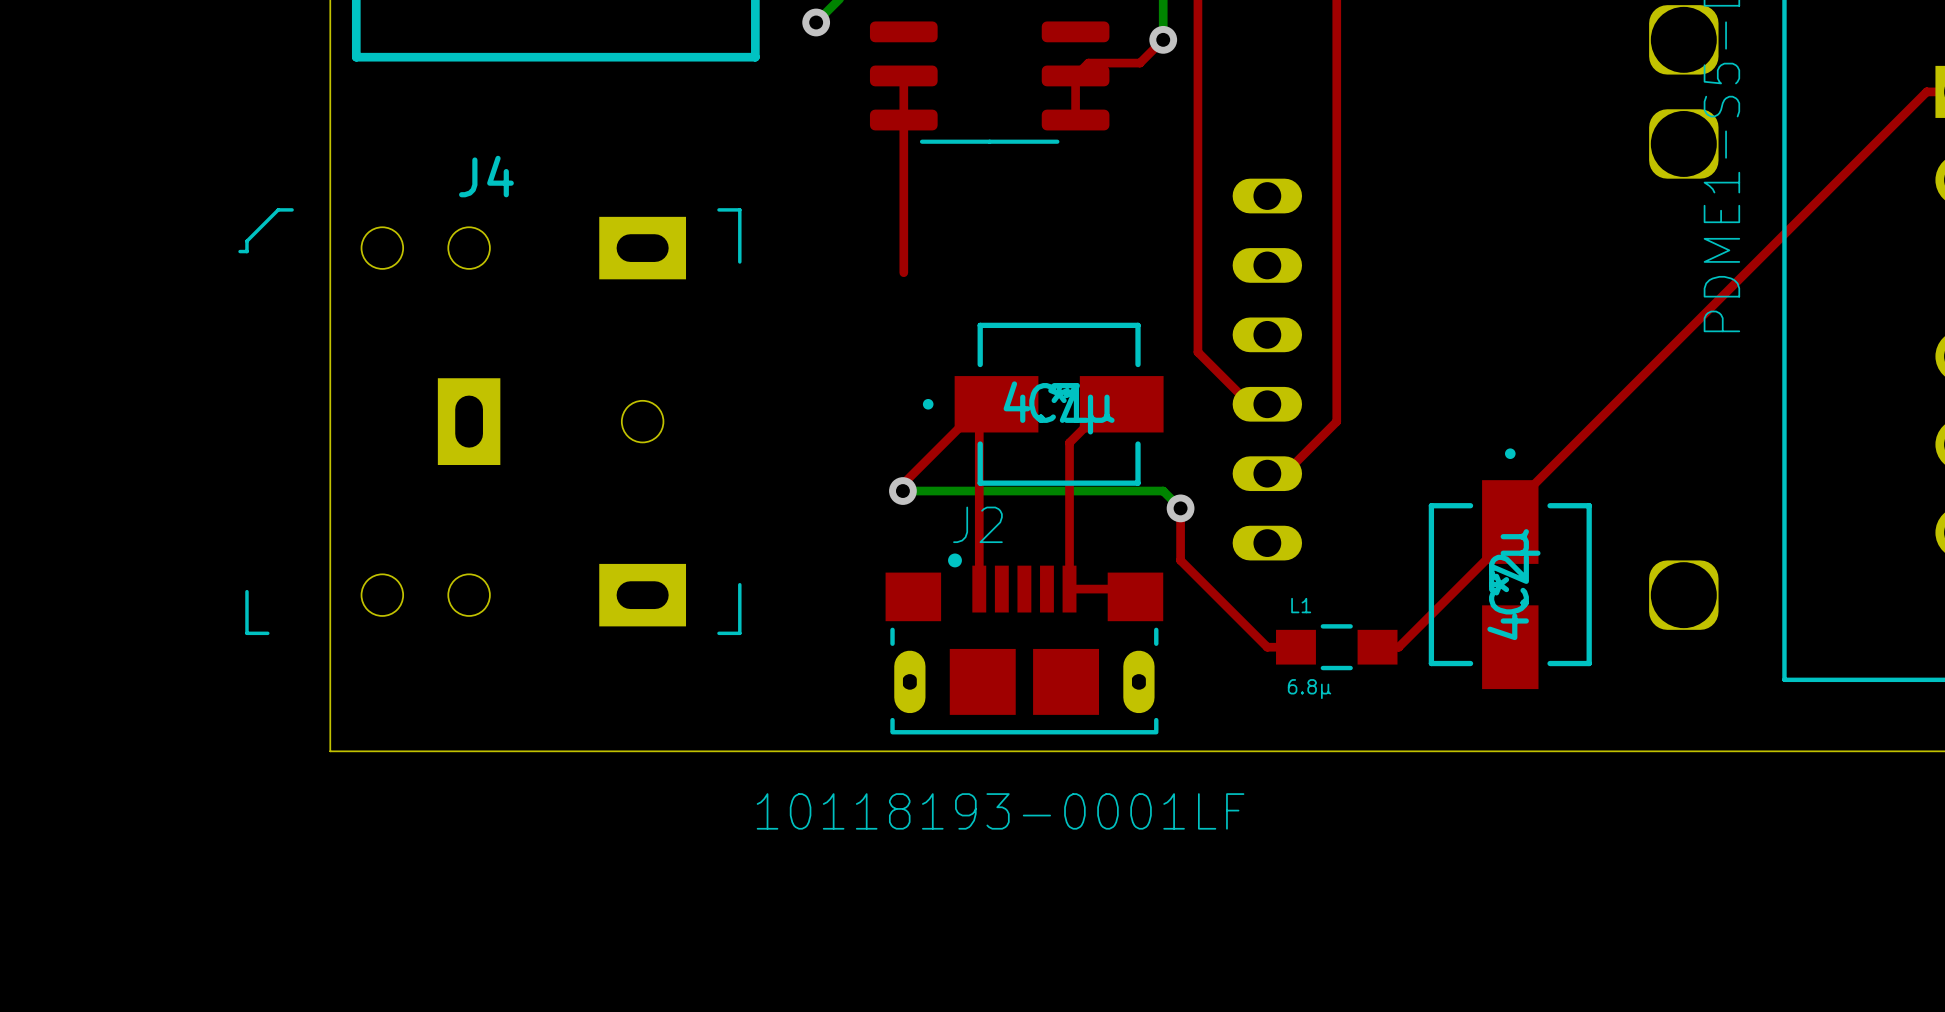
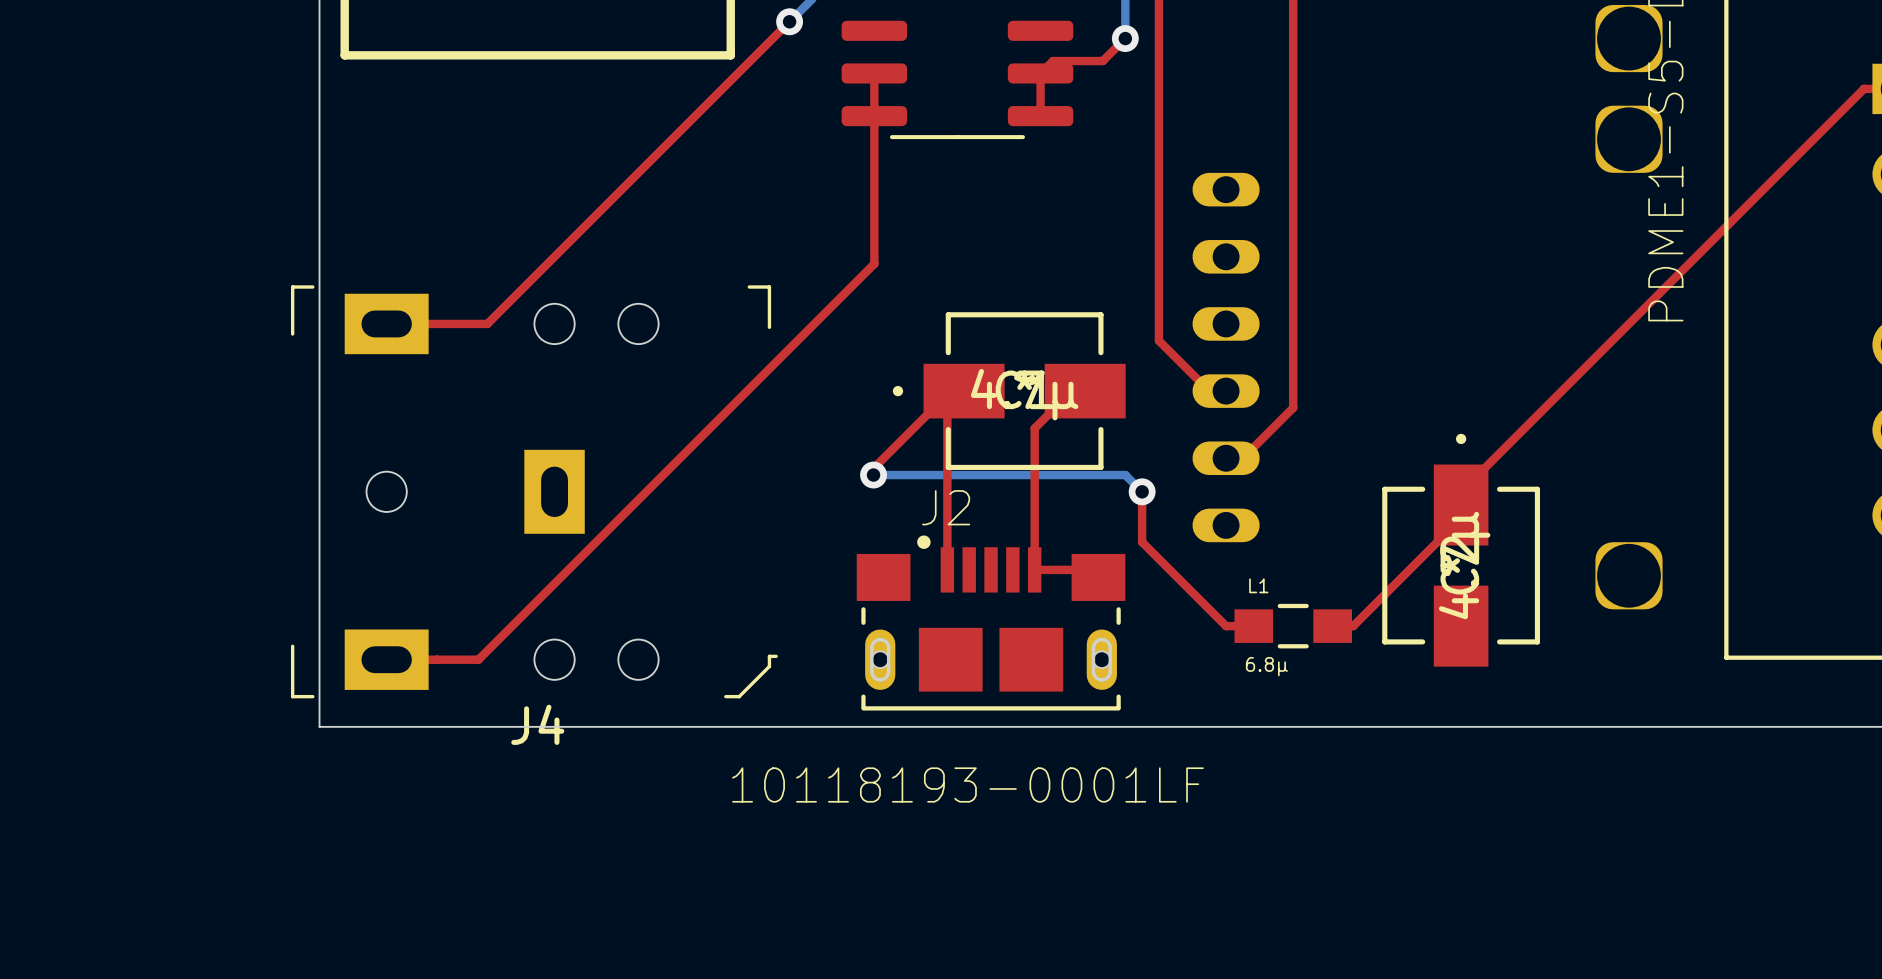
top track: none -> (789, 21) (487, 323) (386, 323)
top track: none -> (874, 263) (478, 659) (386, 659)
J4 rotation: 0° (489, 421) -> 180° (534, 491)

